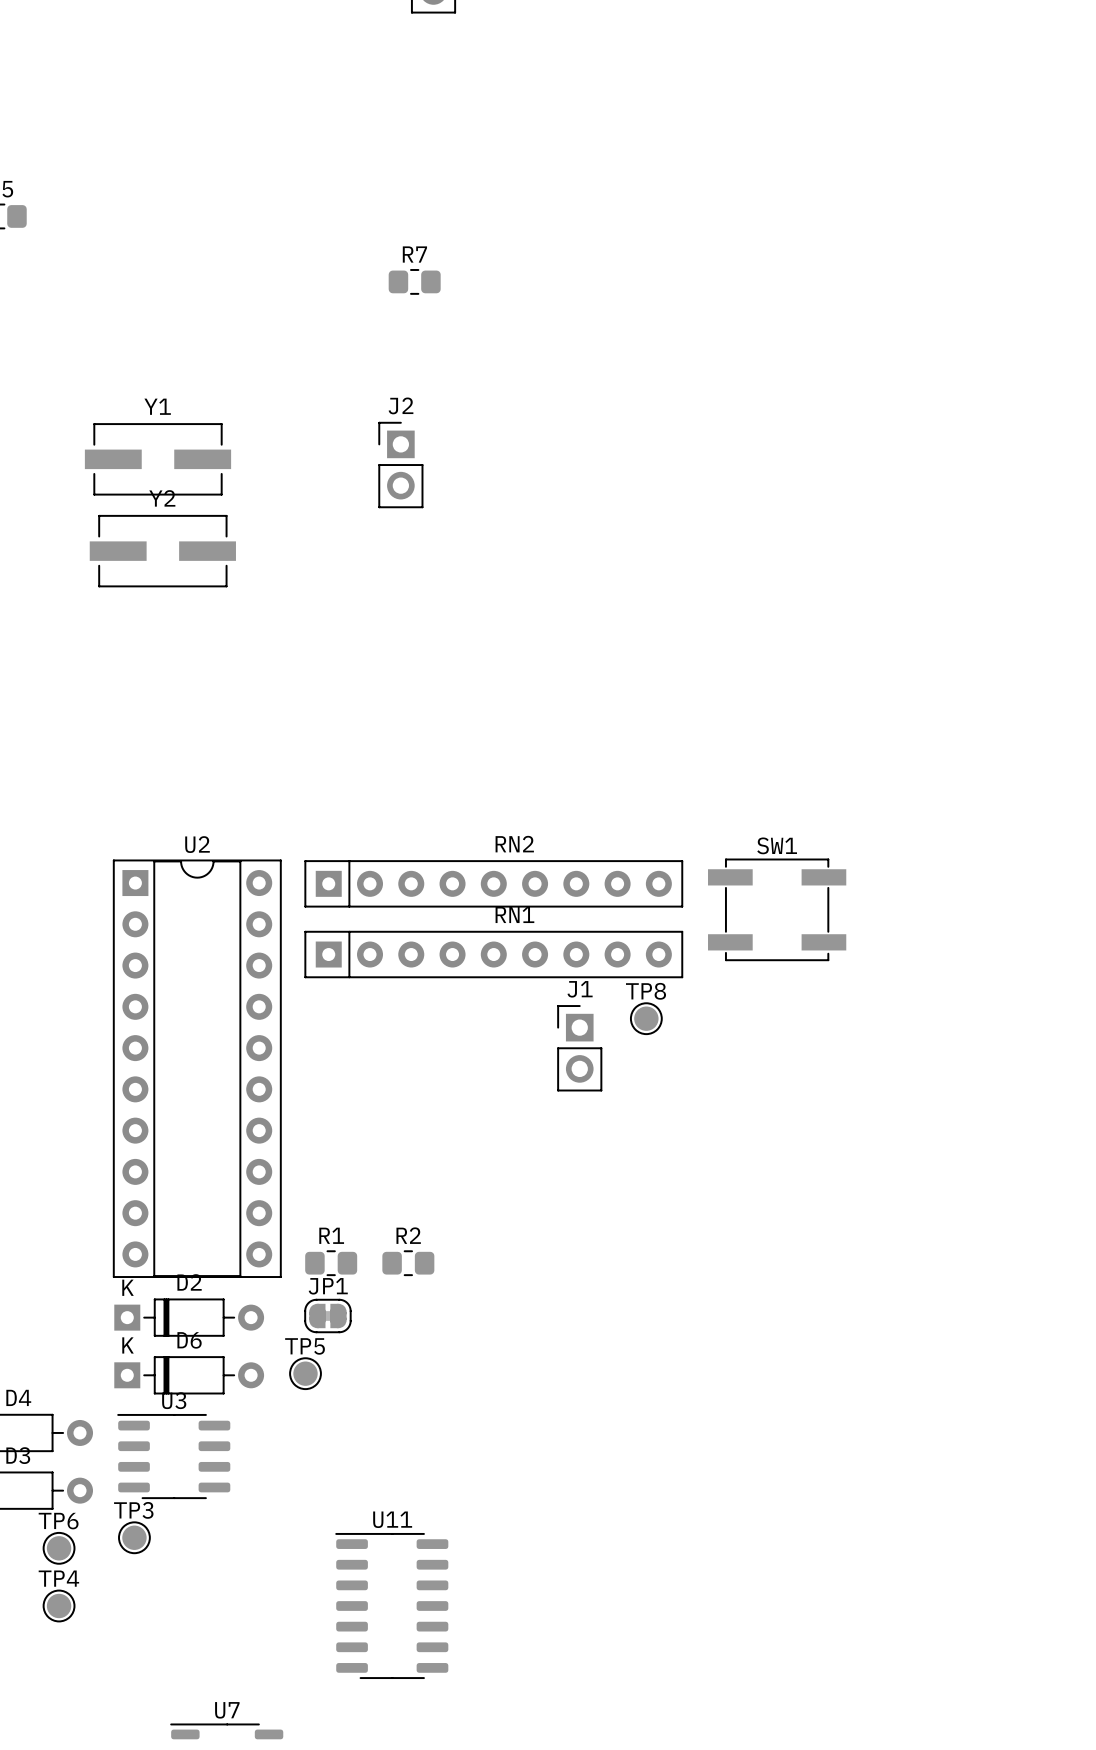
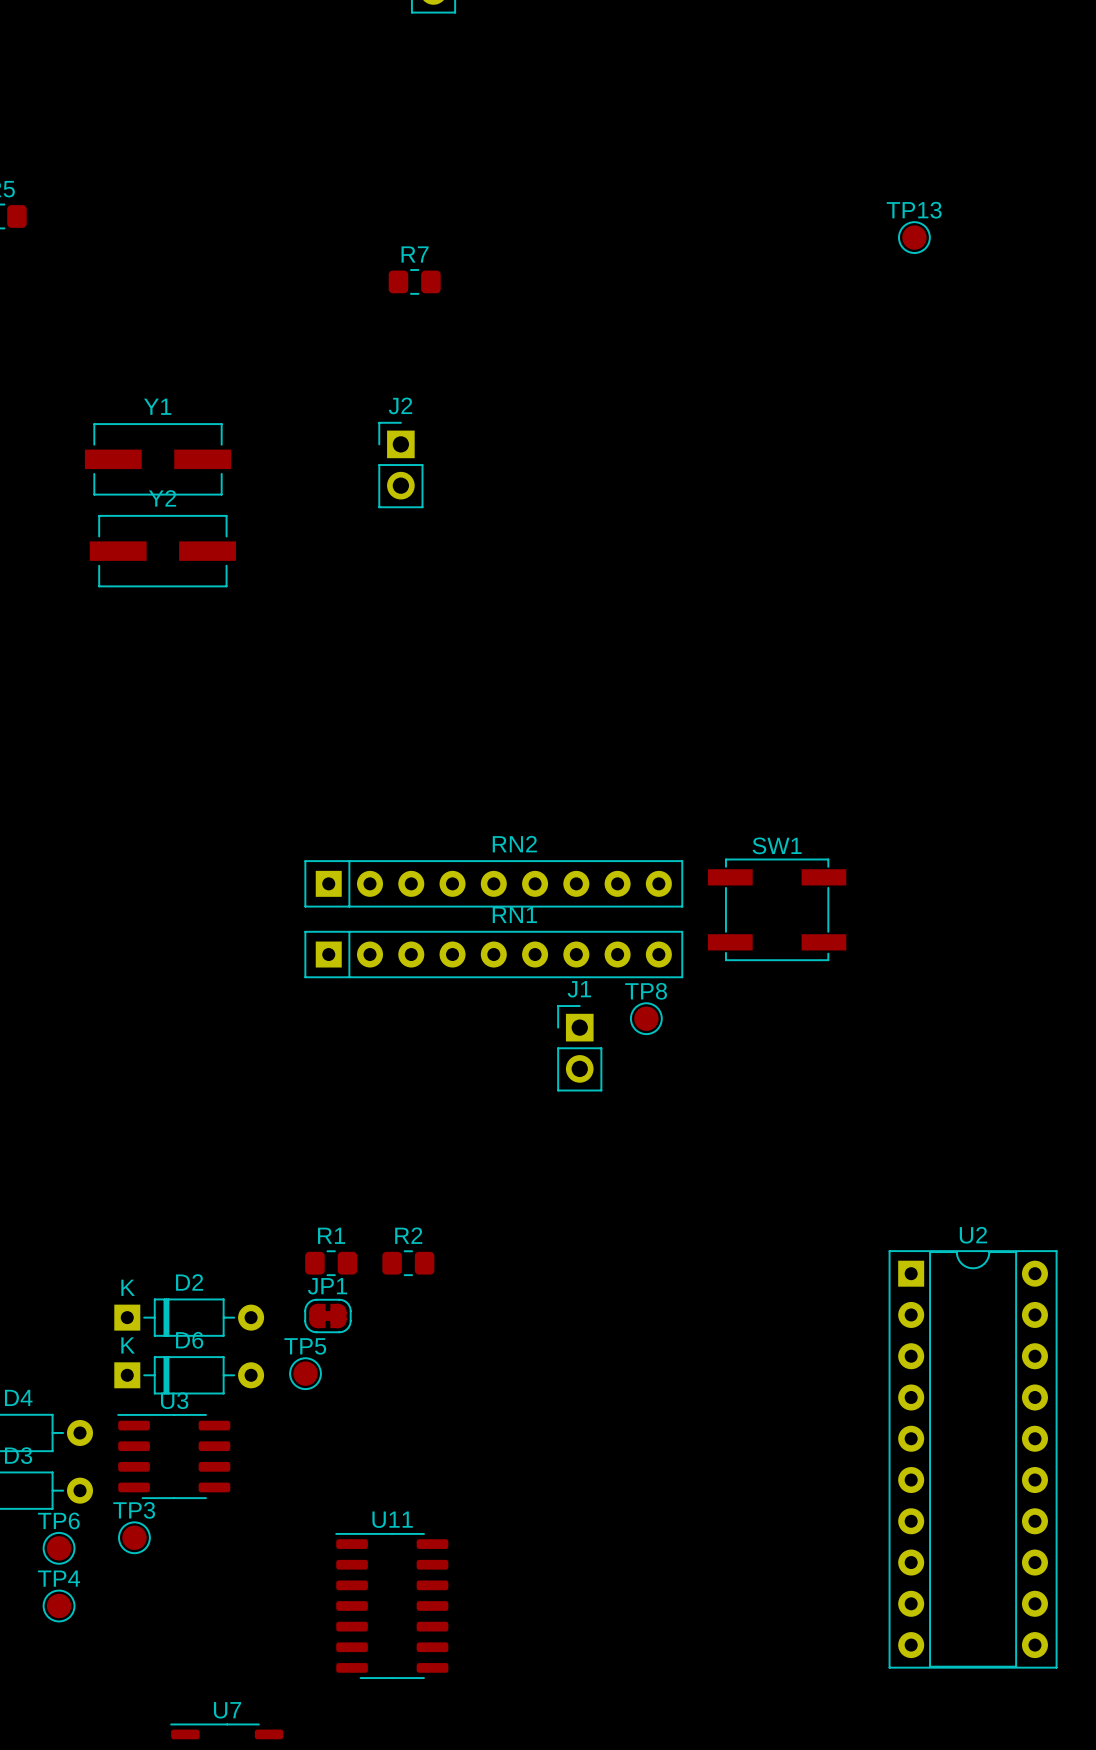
TP13: none -> (914, 237)
U2 position: (197, 1068) -> (973, 1459)

